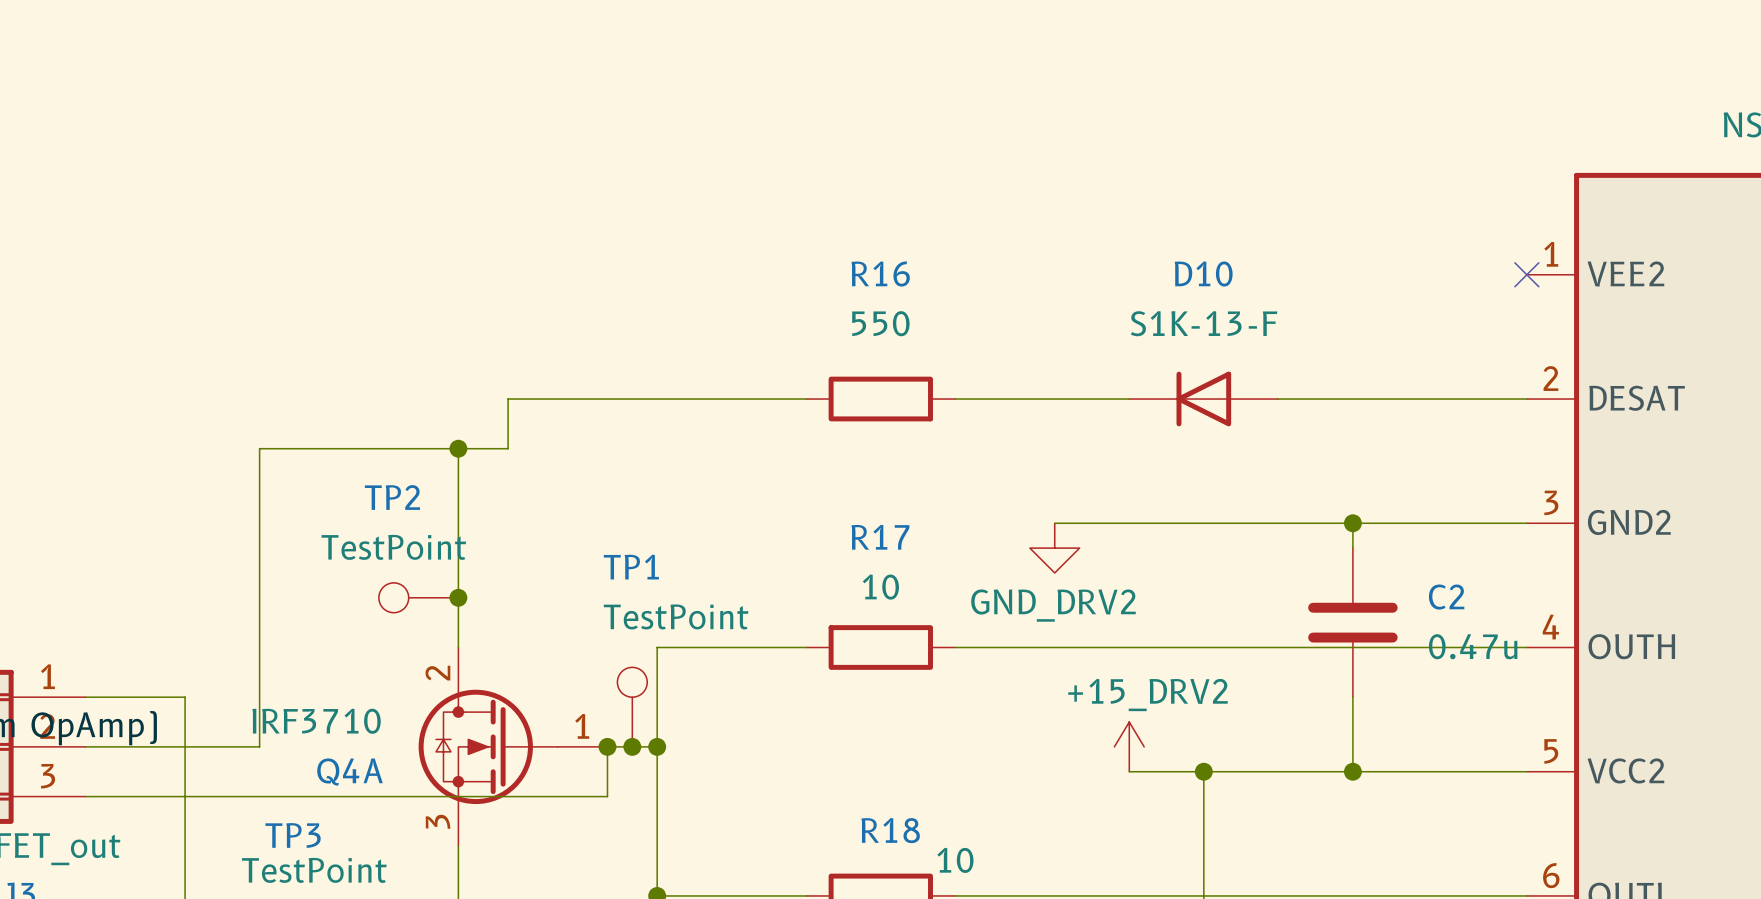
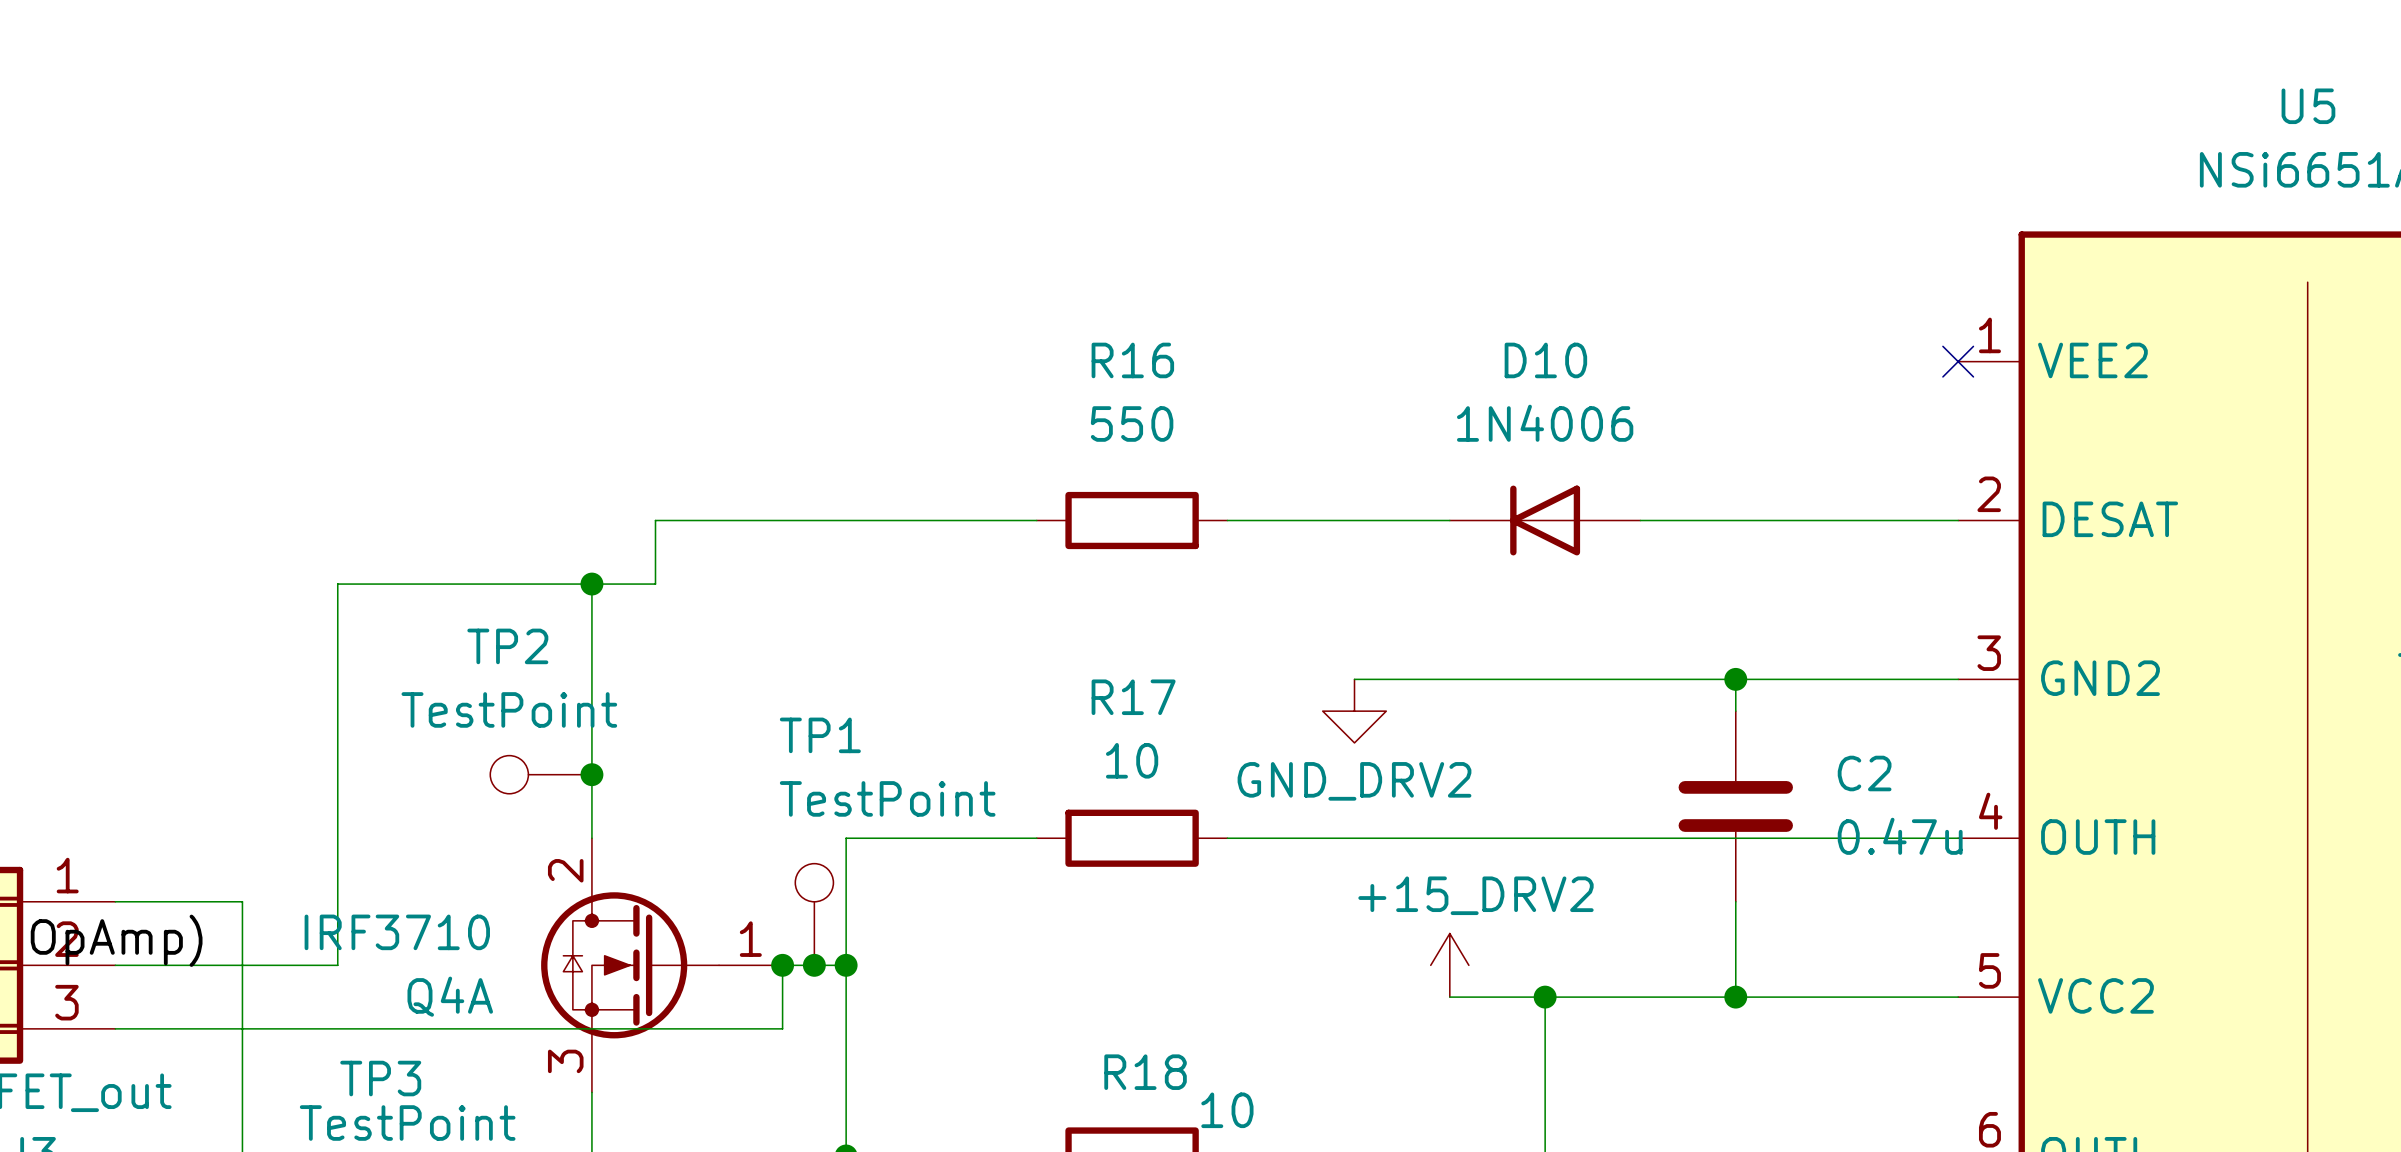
D10 value: S1K-13-F (1204, 323) -> 1N4006 (1545, 423)

